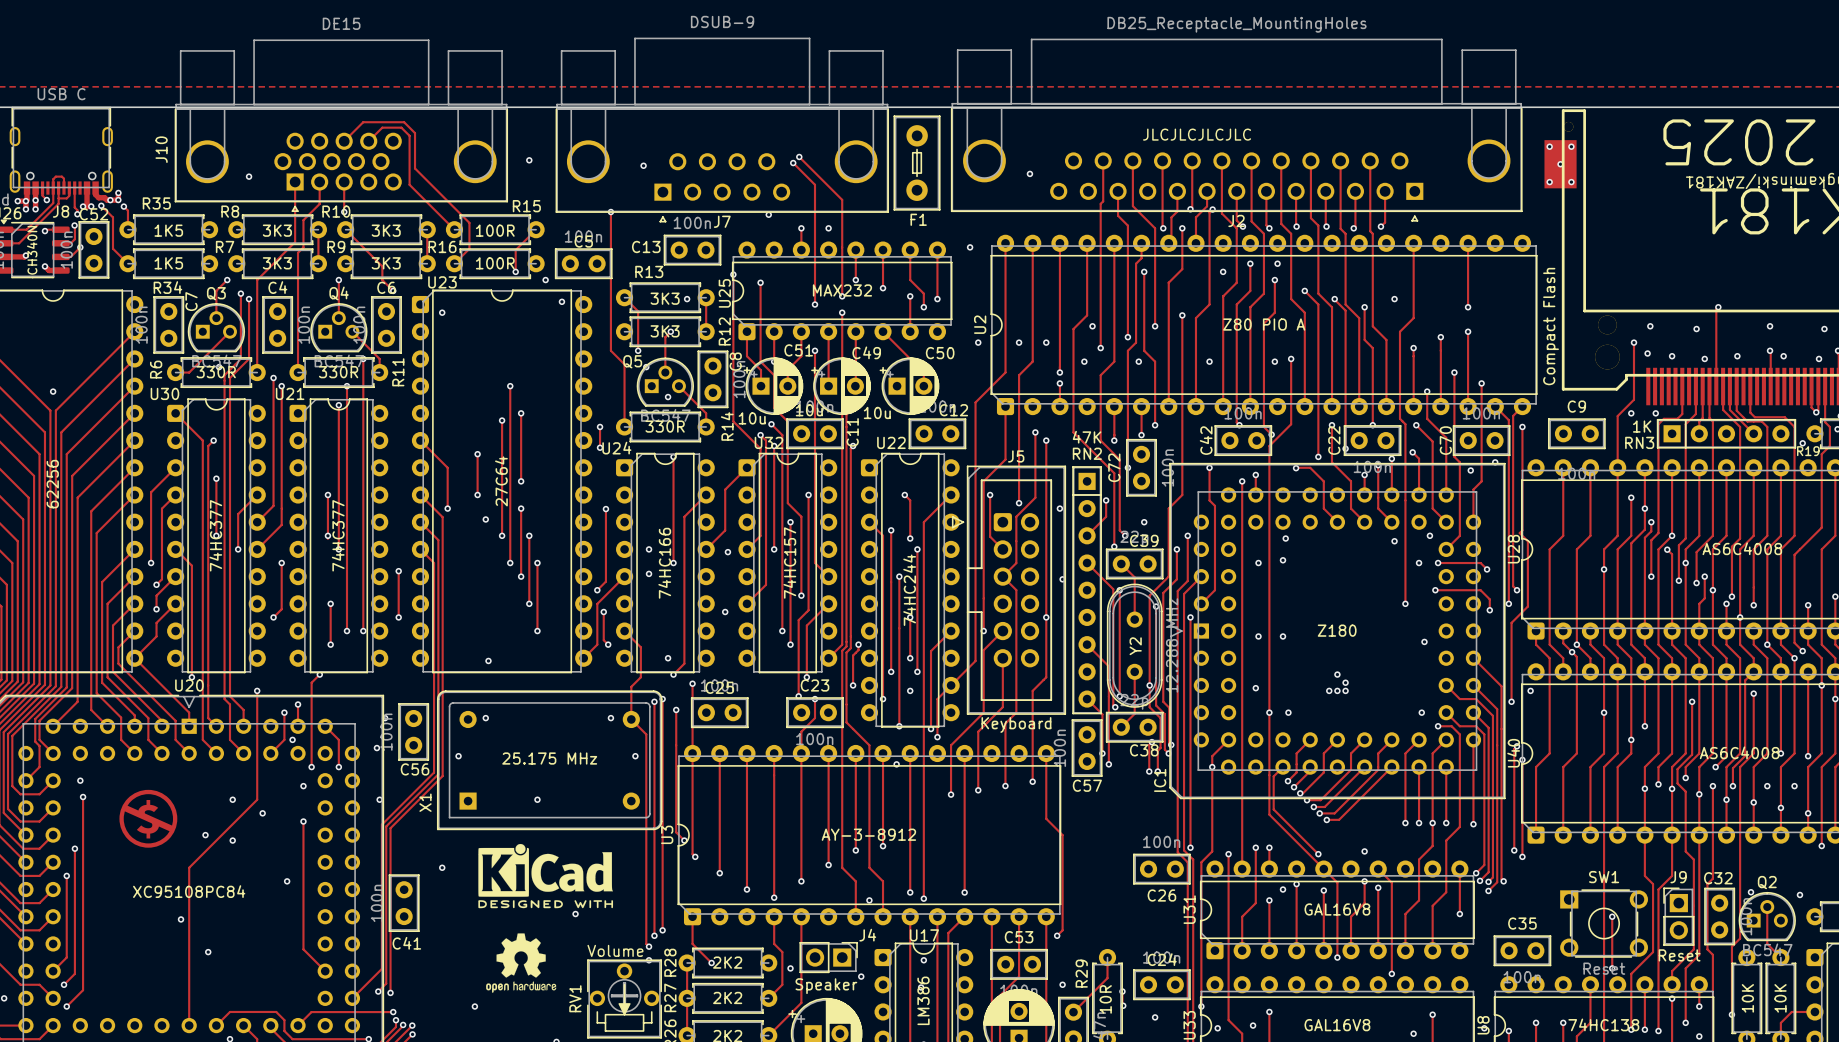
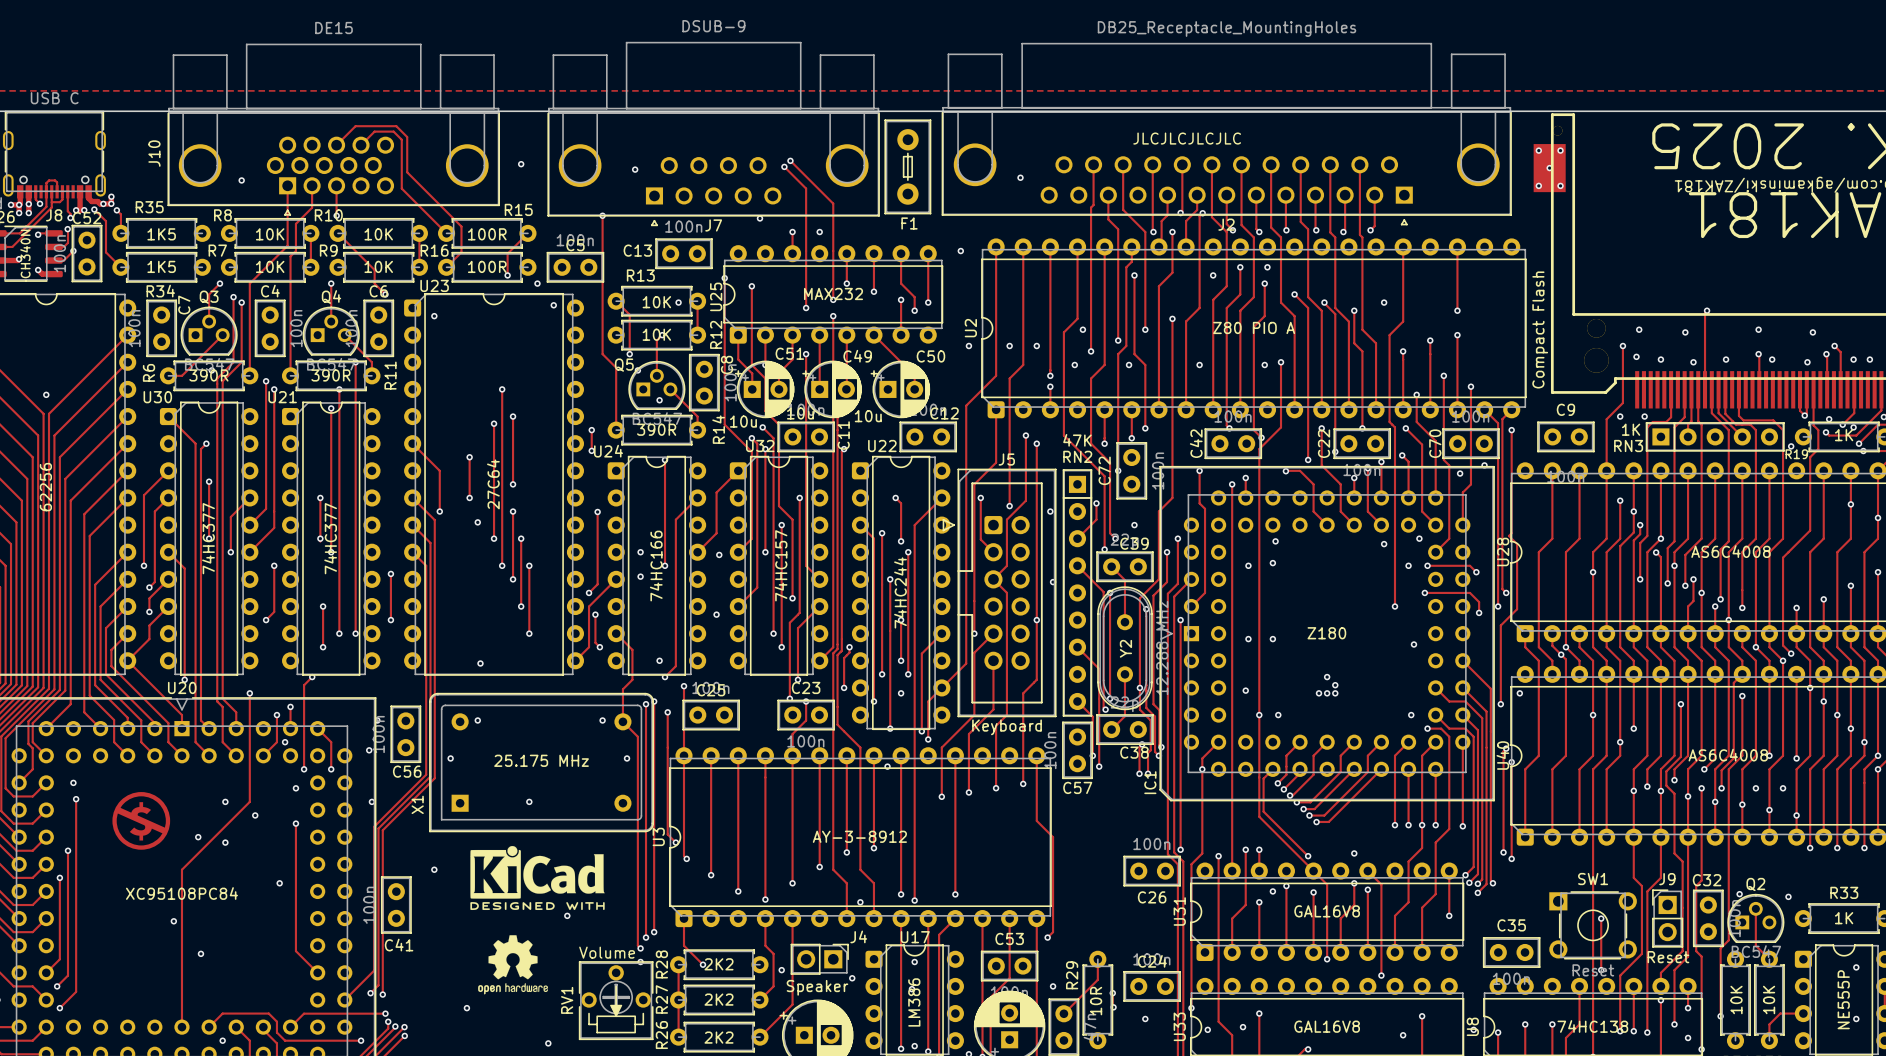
R8 value: 3K3 (277, 230) -> 10K (270, 234)
R10 value: 3K3 (386, 230) -> 10K (378, 234)
R7 value: 3K3 (277, 263) -> 10K (270, 266)
R9 value: 3K3 (386, 263) -> 10K (378, 266)
R13 value: 3K3 (665, 298) -> 10K (656, 302)
R12 value: 3K3 (665, 331) -> 10K (656, 334)
R6 value: 330R (216, 372) -> 390R (208, 375)
R11 value: 330R (338, 372) -> 390R (330, 375)
R14 value: 330R (665, 426) -> 390R (656, 429)

